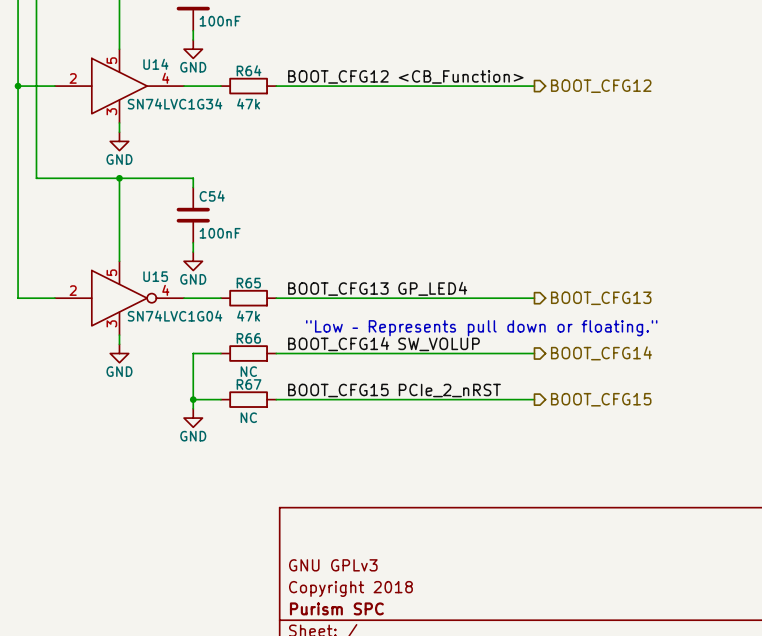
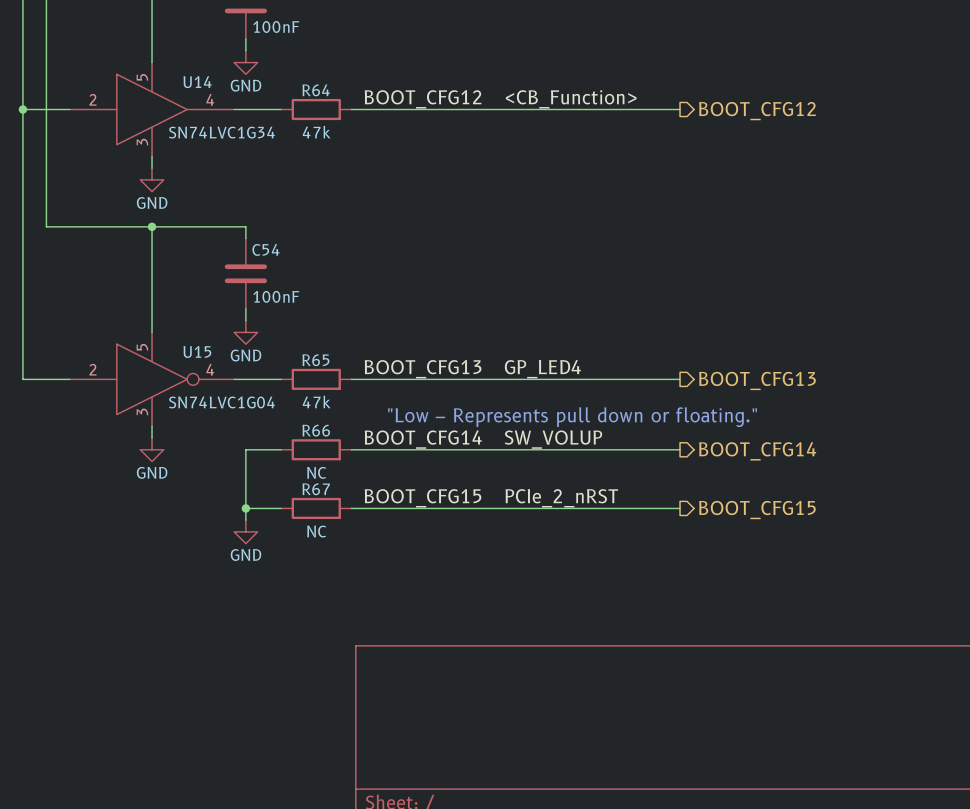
title block: GNU GPLv3 (333, 565) -> none
title block: Copyright 2018 (350, 588) -> none
title block: Purism SPC (336, 608) -> none

